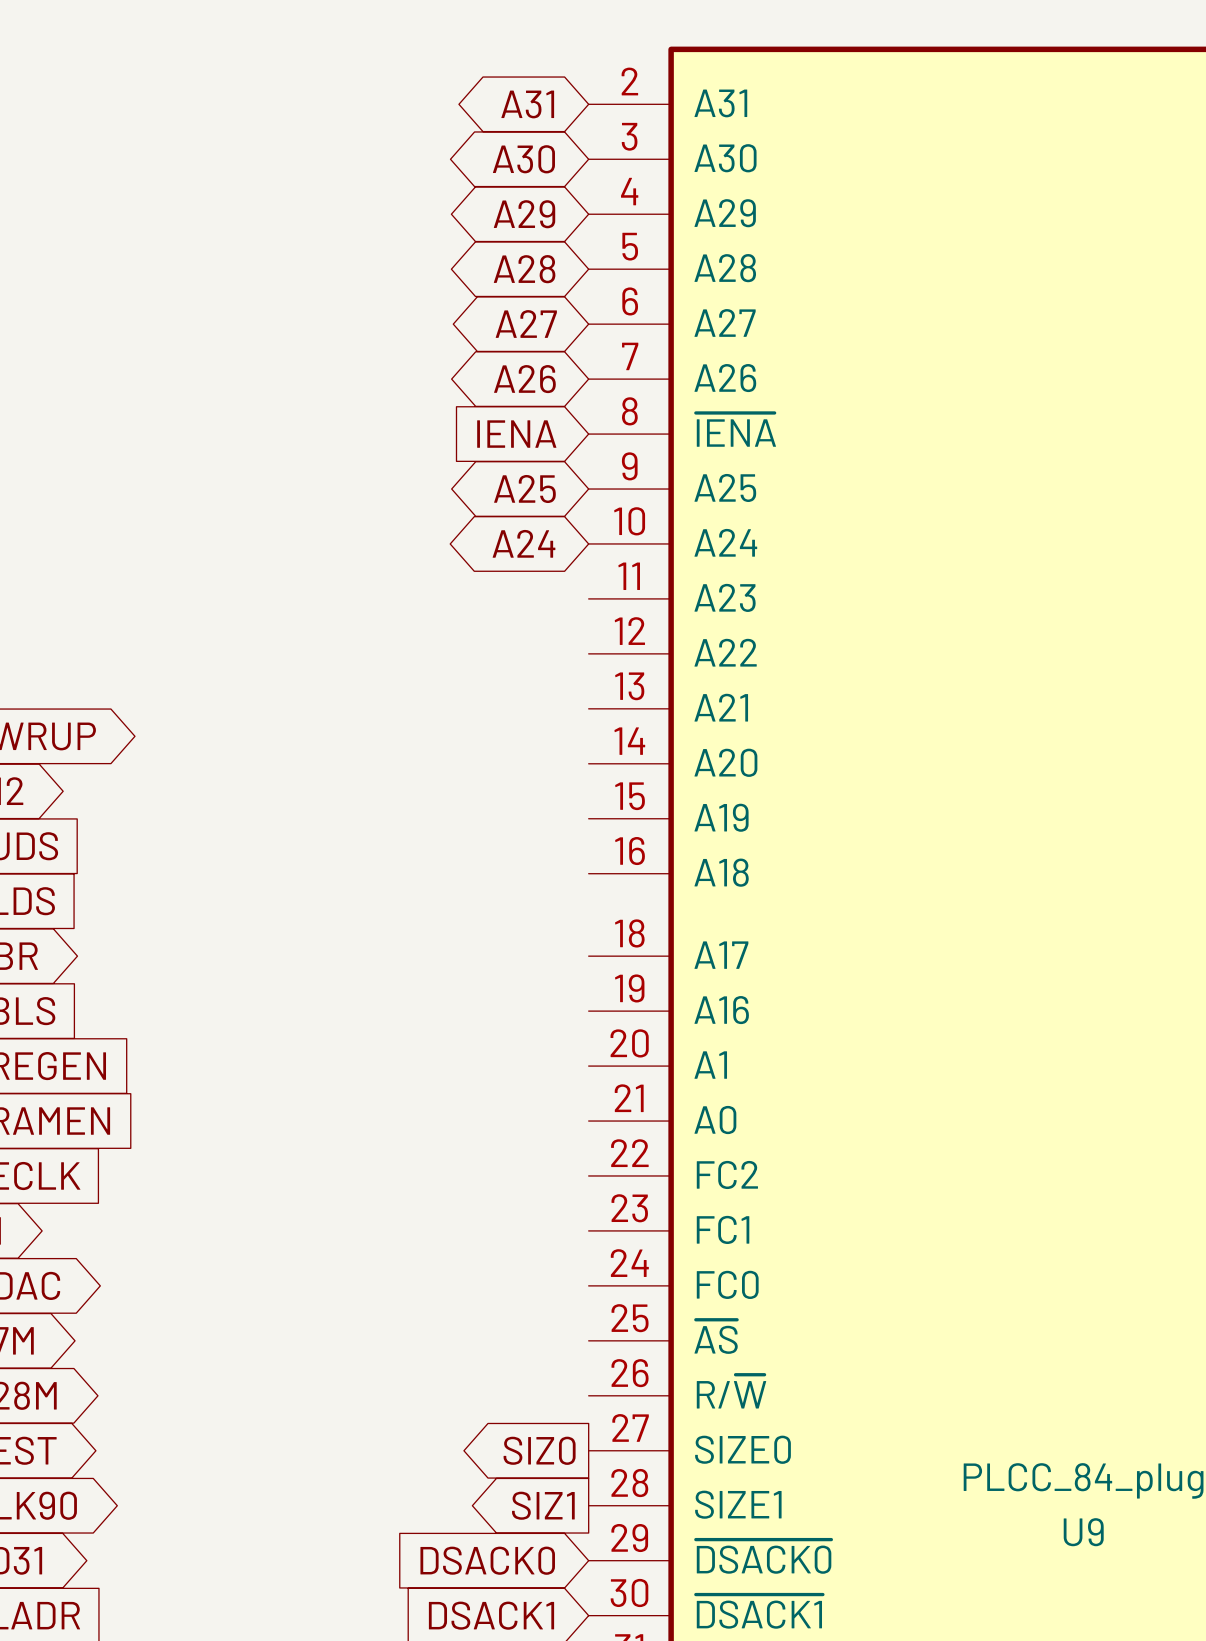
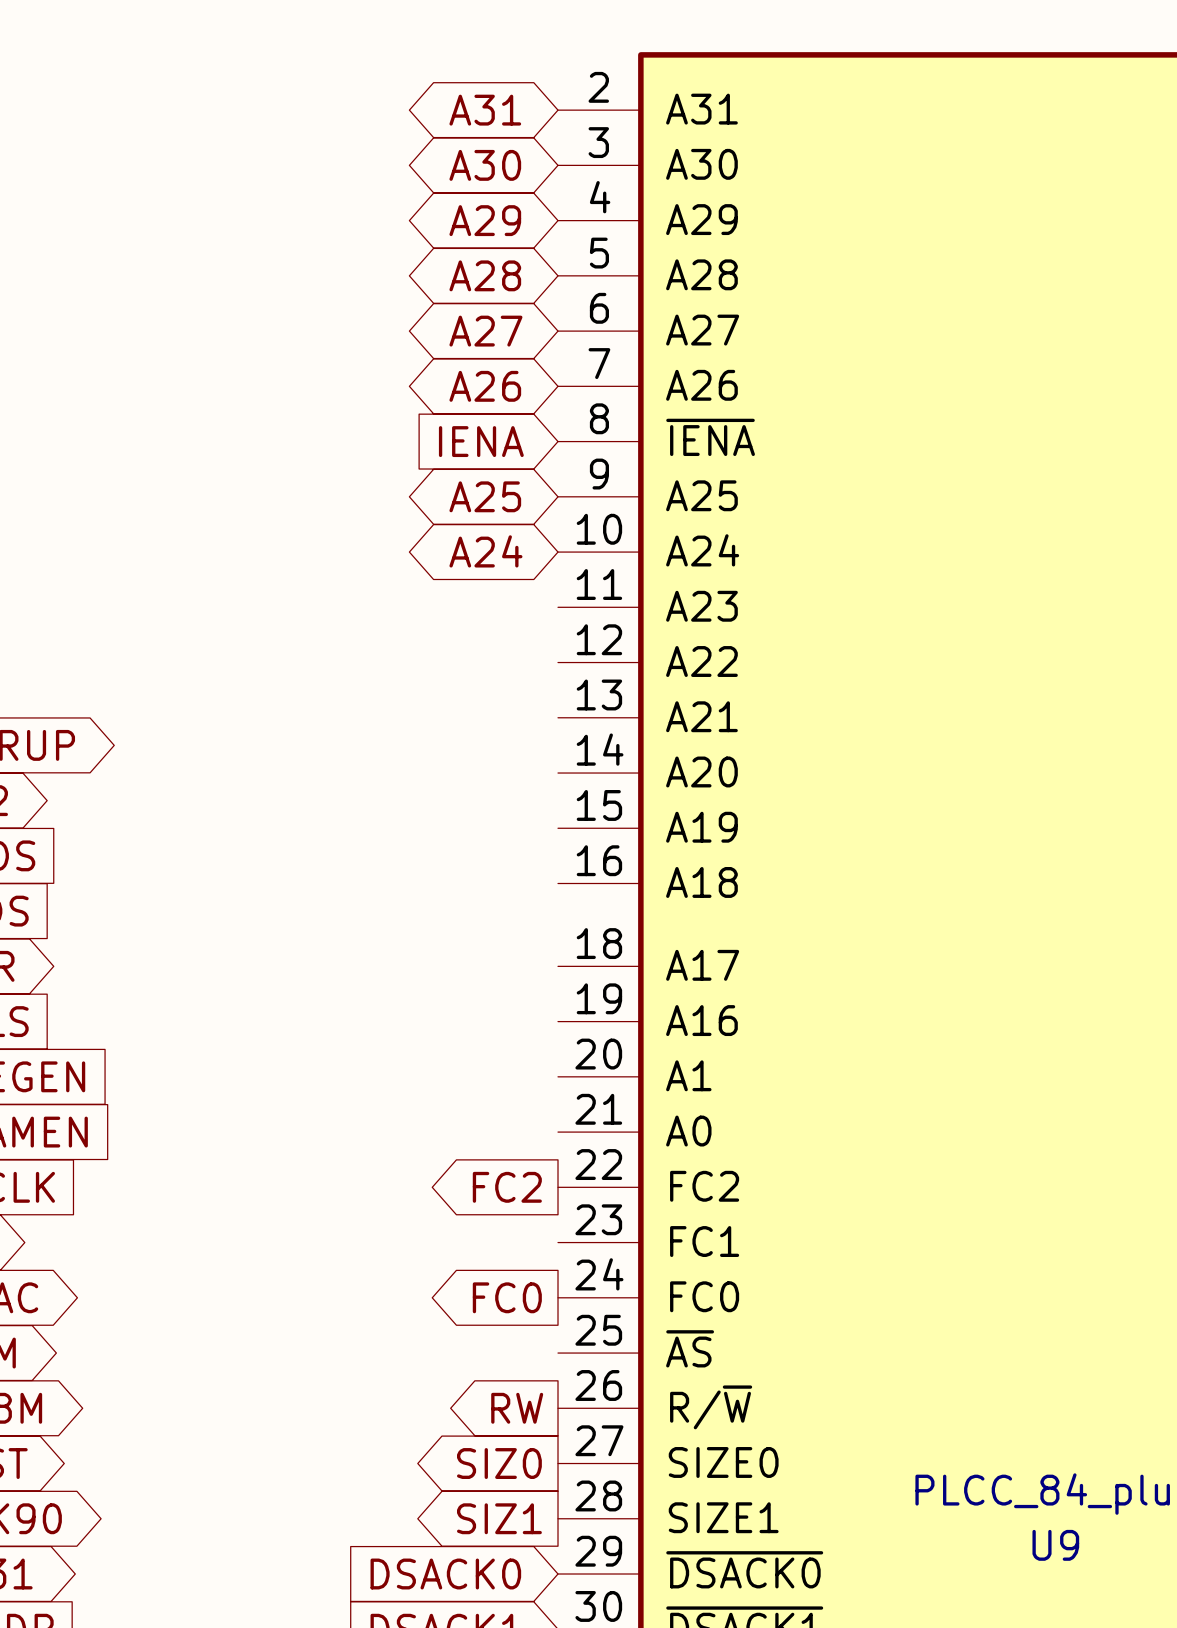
global label: none -> FC2 (507, 1187)
global label: none -> FC0 (507, 1297)
global label: none -> RW (517, 1408)

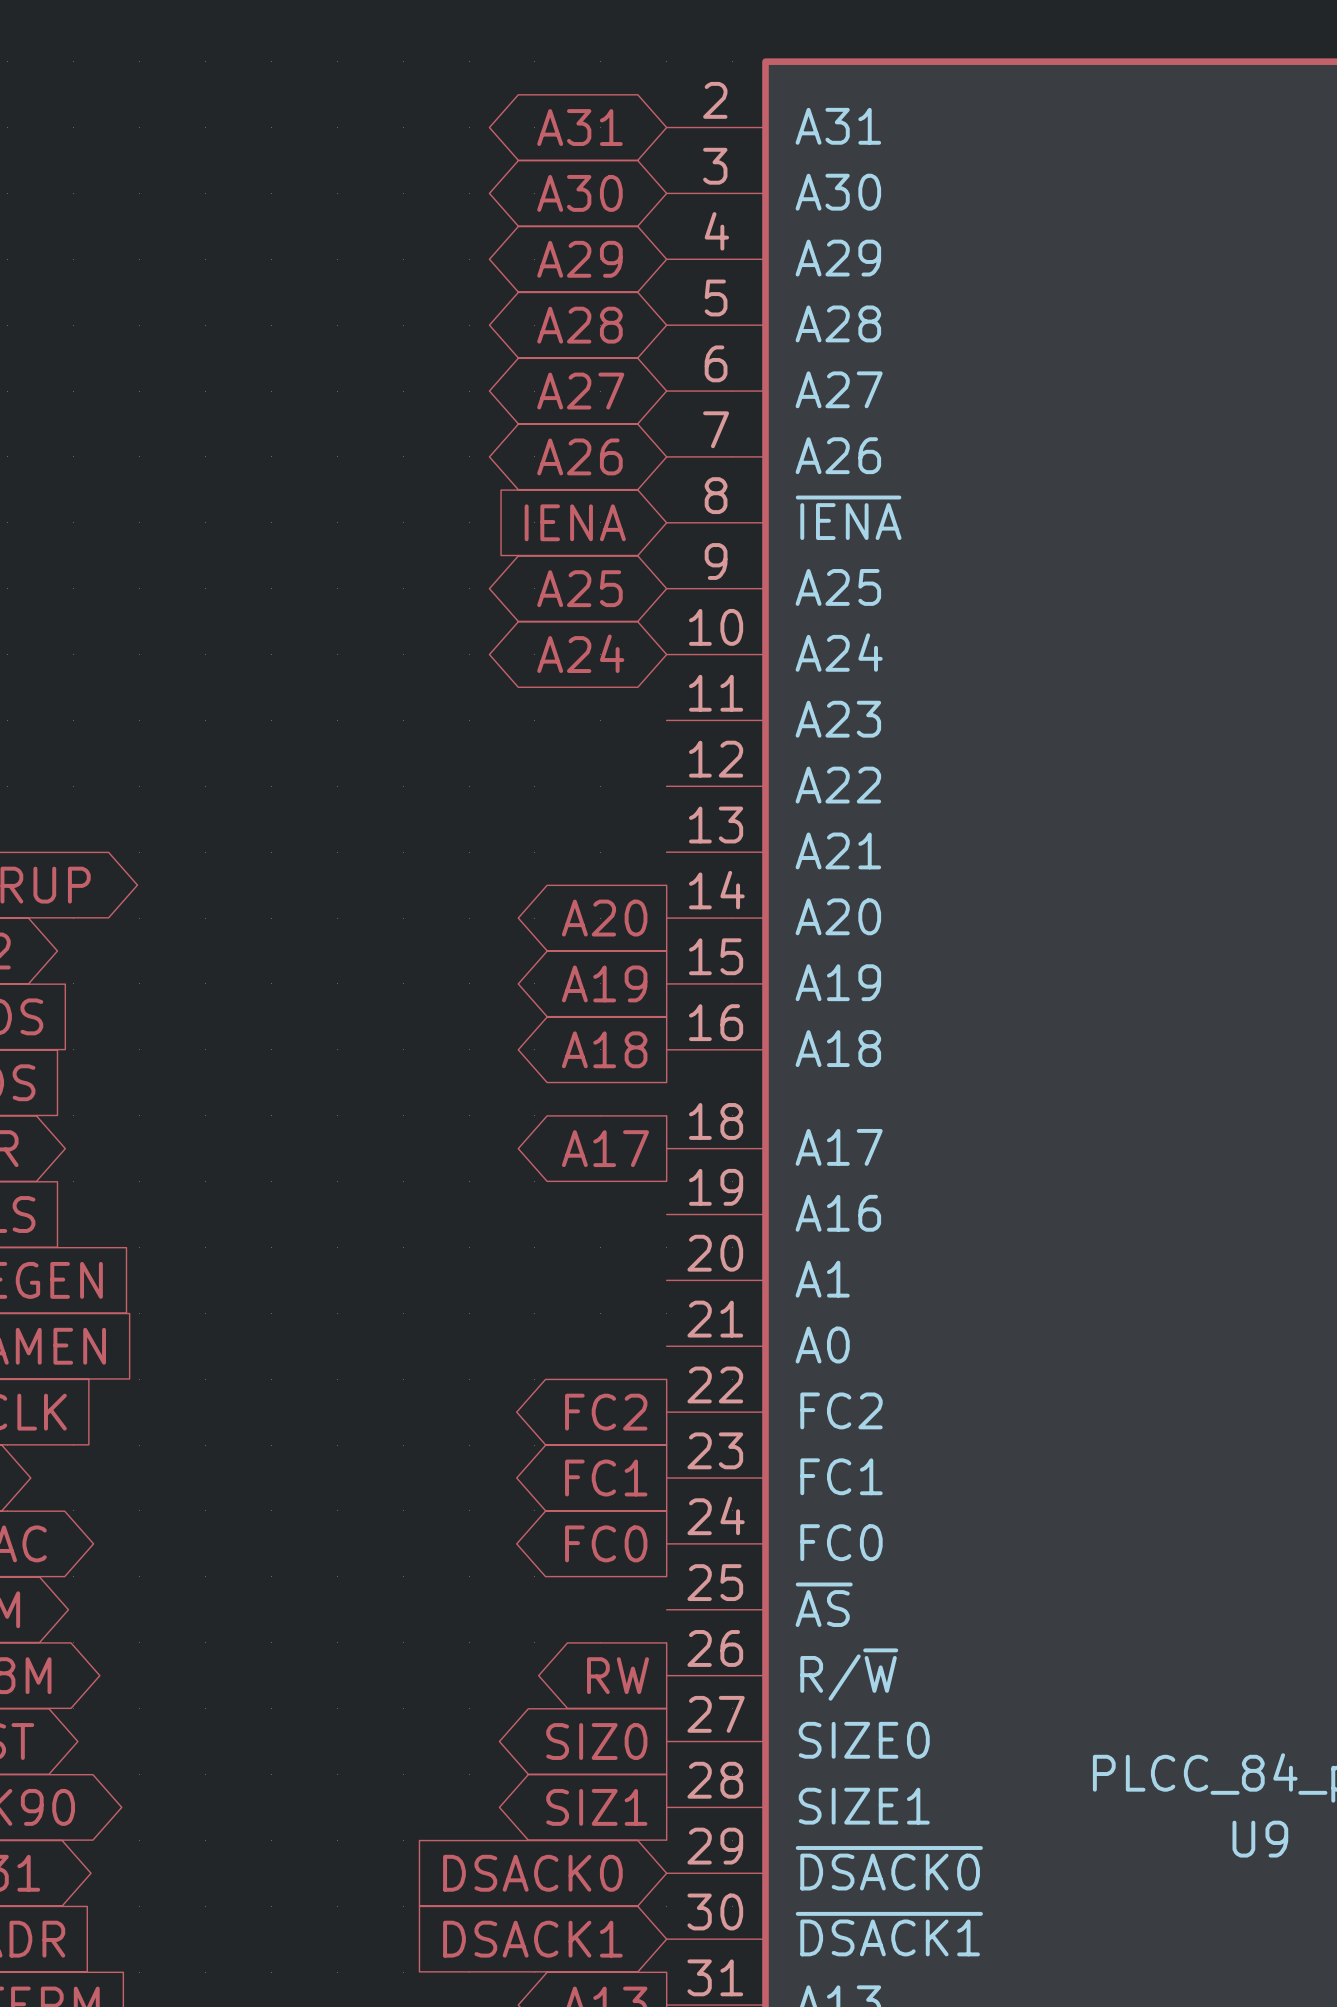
global label: none -> A20 (604, 918)
global label: none -> A19 (604, 983)
global label: none -> A18 (604, 1049)
global label: none -> A17 (605, 1148)
global label: none -> FC1 (606, 1478)

